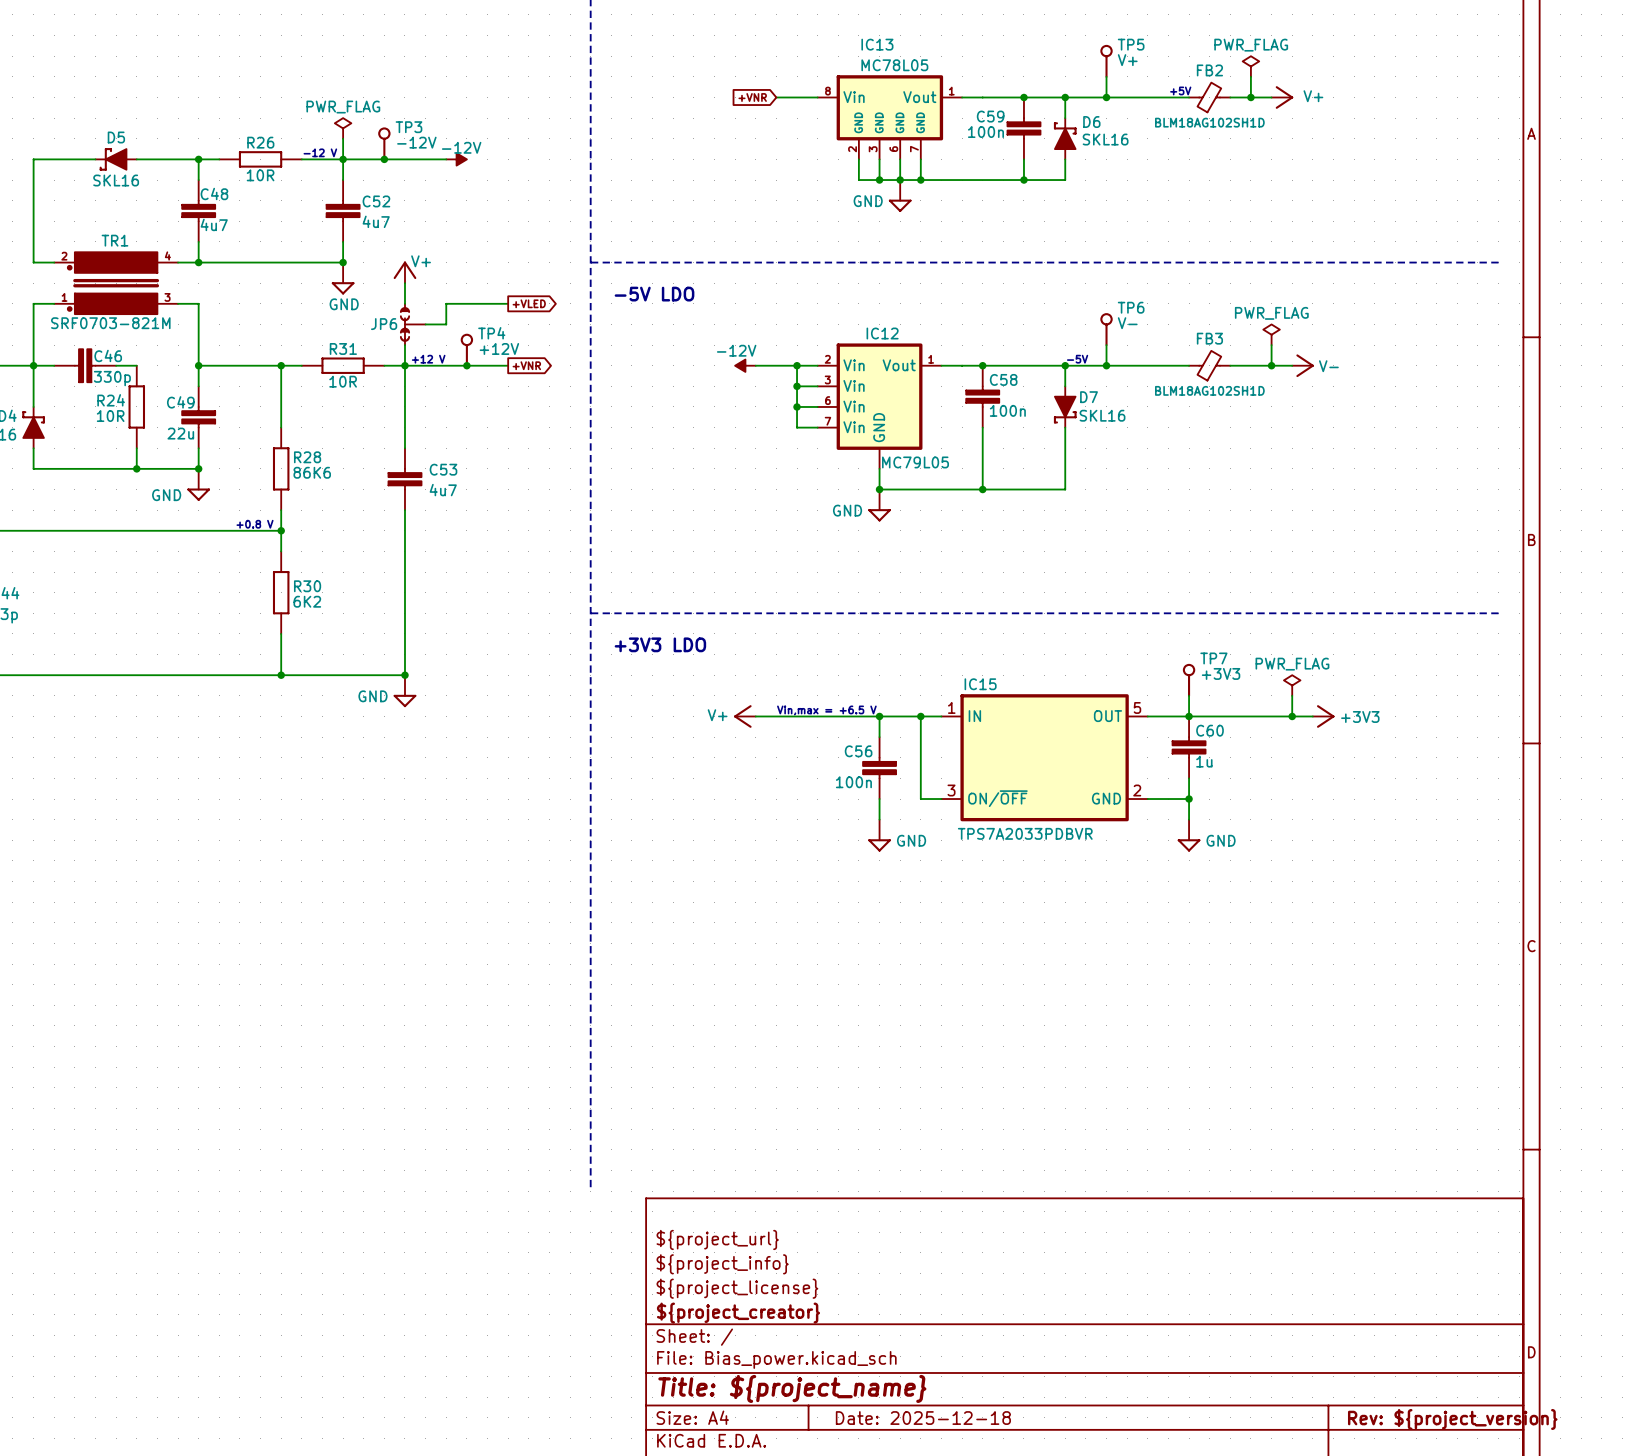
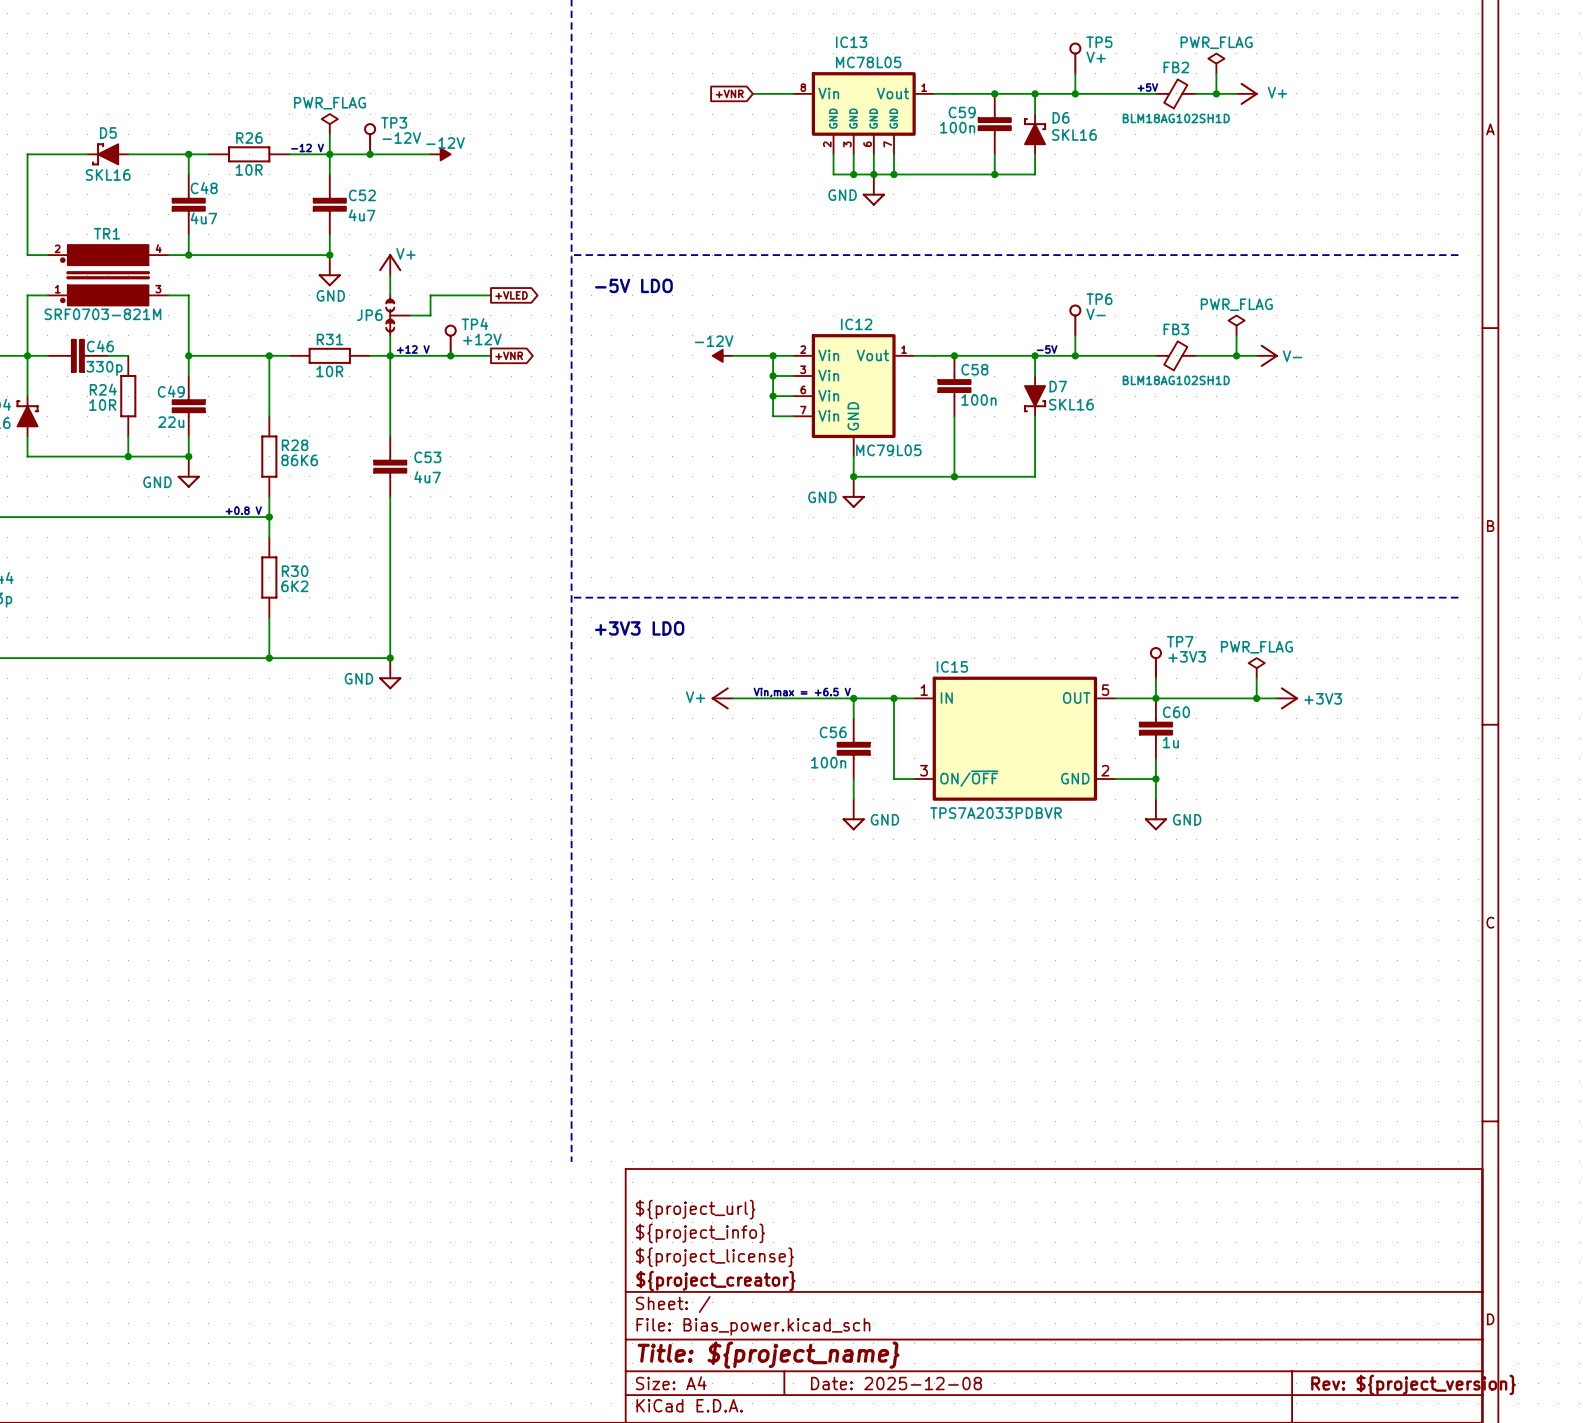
title block: Date: 2025-12-18 (923, 1418) -> Date: 2025-12-08 (896, 1383)

